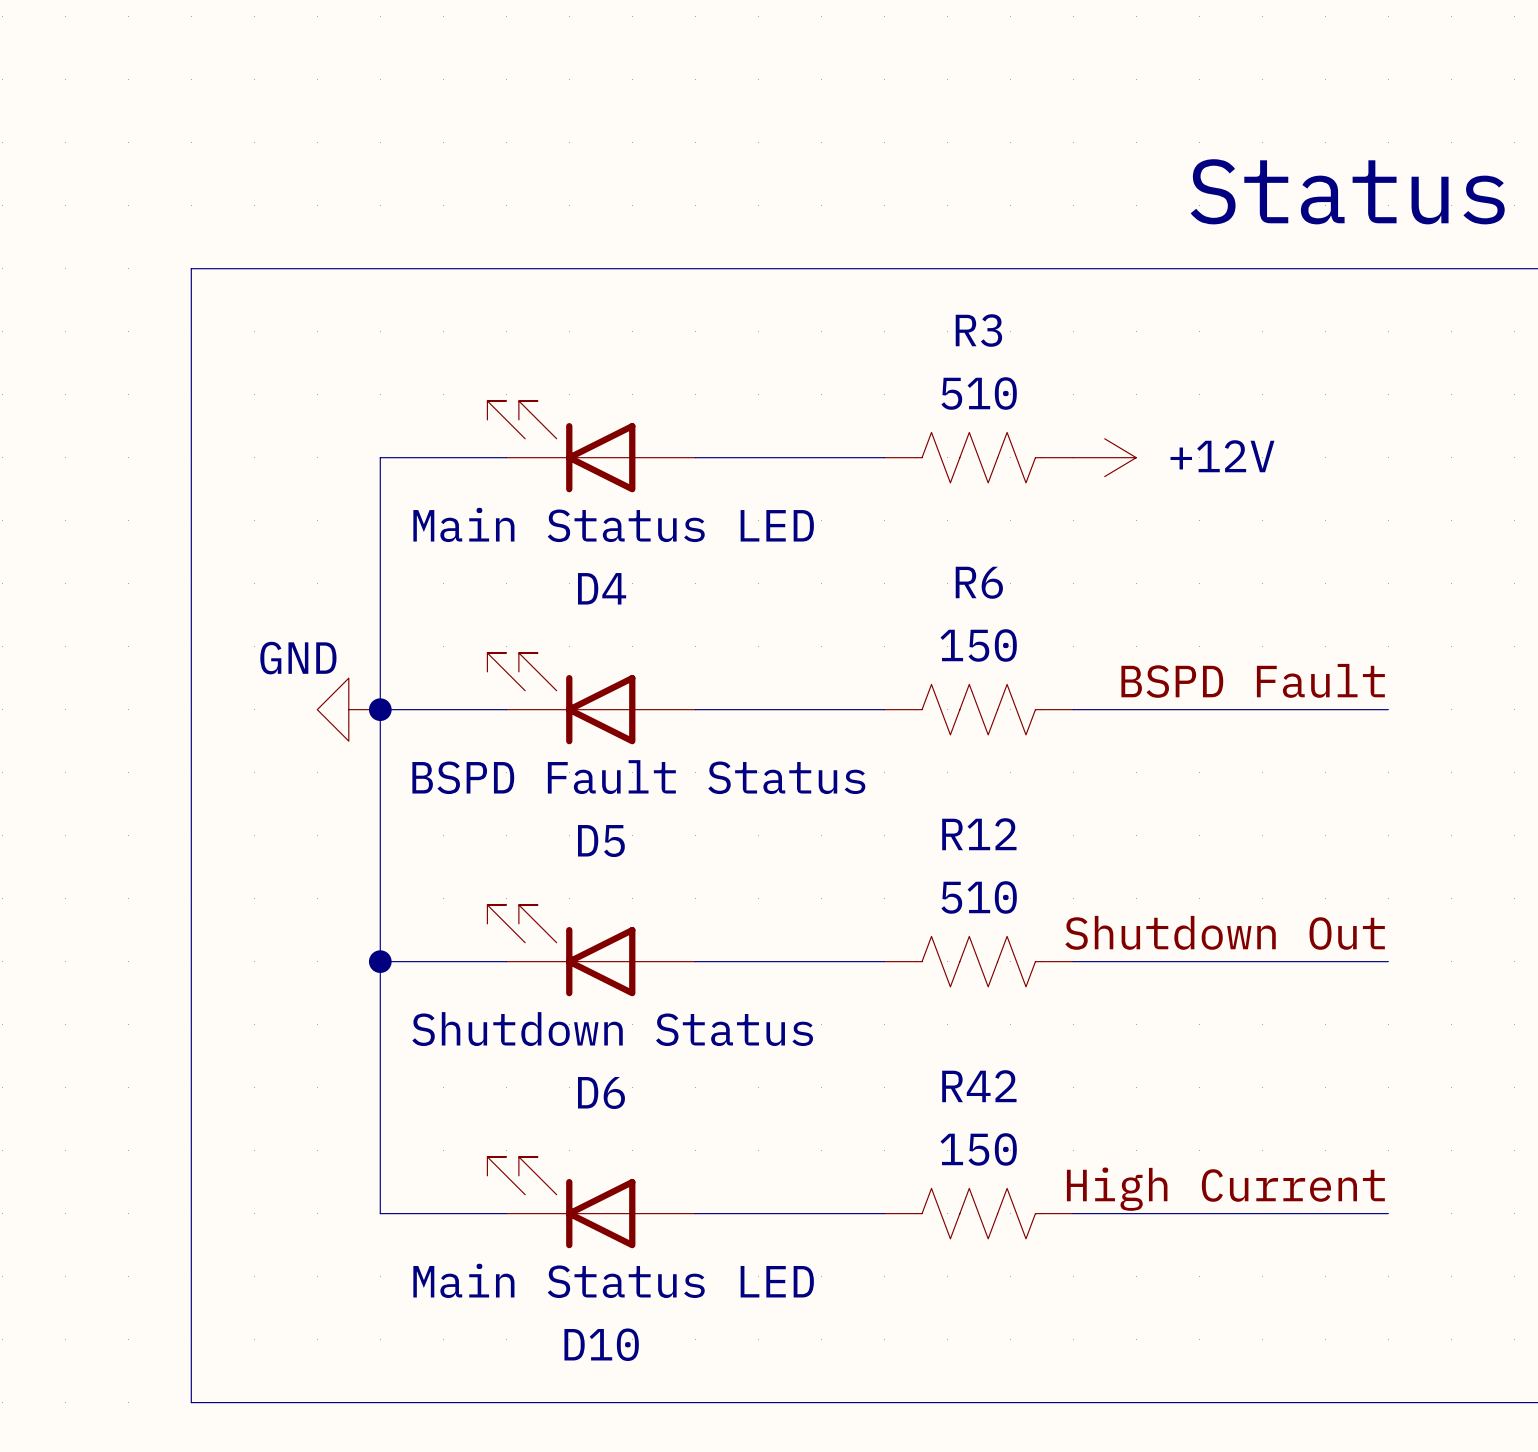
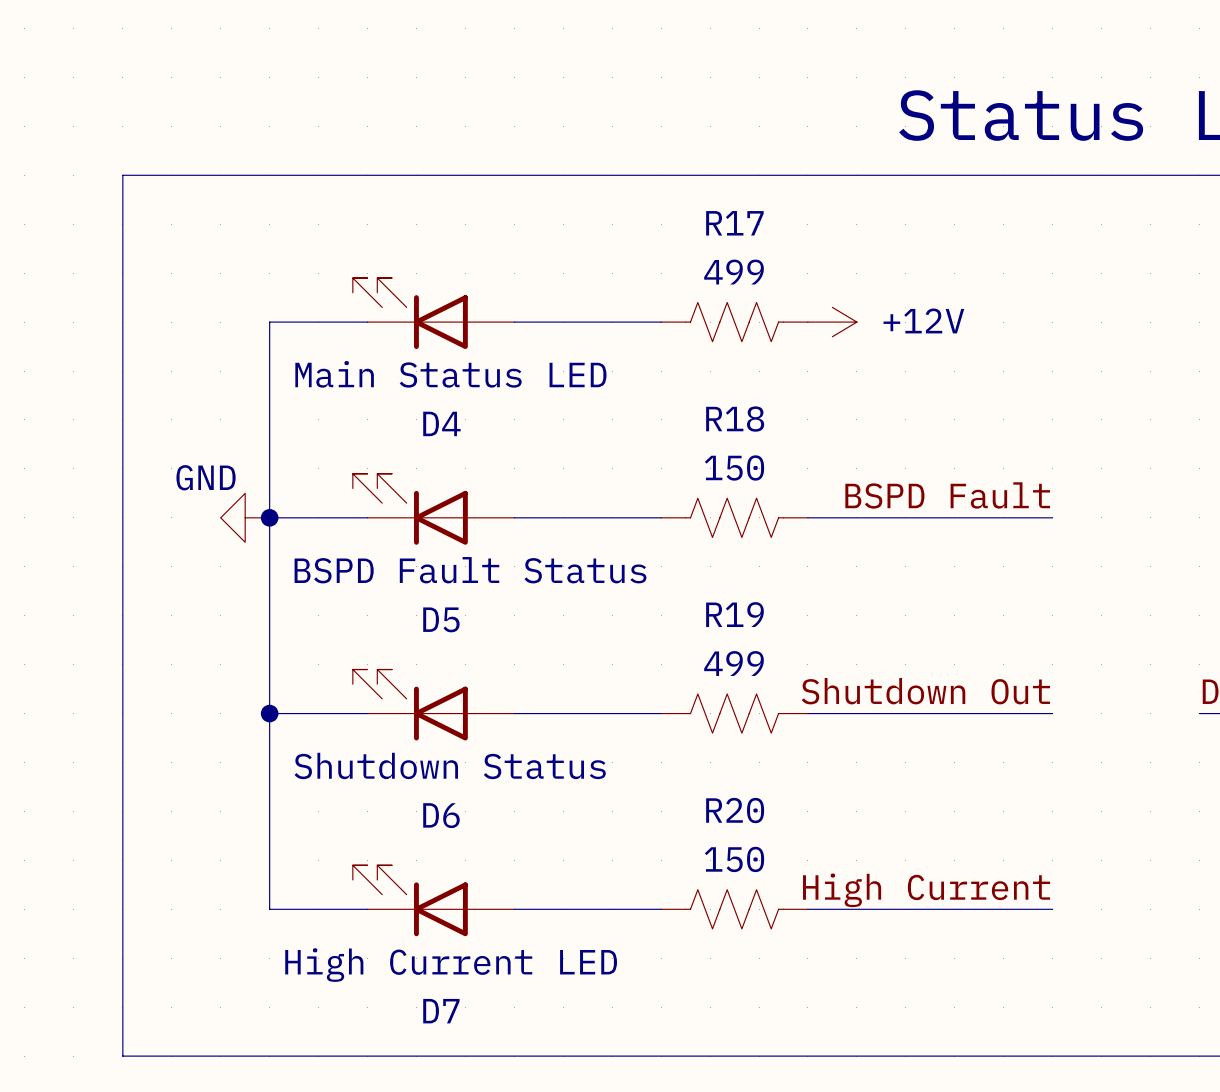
R3 name: R3 (978, 330) -> R17 (734, 223)
R3 value: 510 (979, 393) -> 499 (734, 272)
R6 name: R6 (979, 582) -> R18 (735, 419)
R12 name: R12 (979, 834) -> R19 (734, 614)
R12 value: 510 (979, 897) -> 499 (734, 663)
R42 name: R42 (979, 1086) -> R20 (735, 810)
D10 value: Main Status LED (613, 1280) -> High Current LED (451, 965)
D10 name: D10 (601, 1344) -> D7 (441, 1011)

